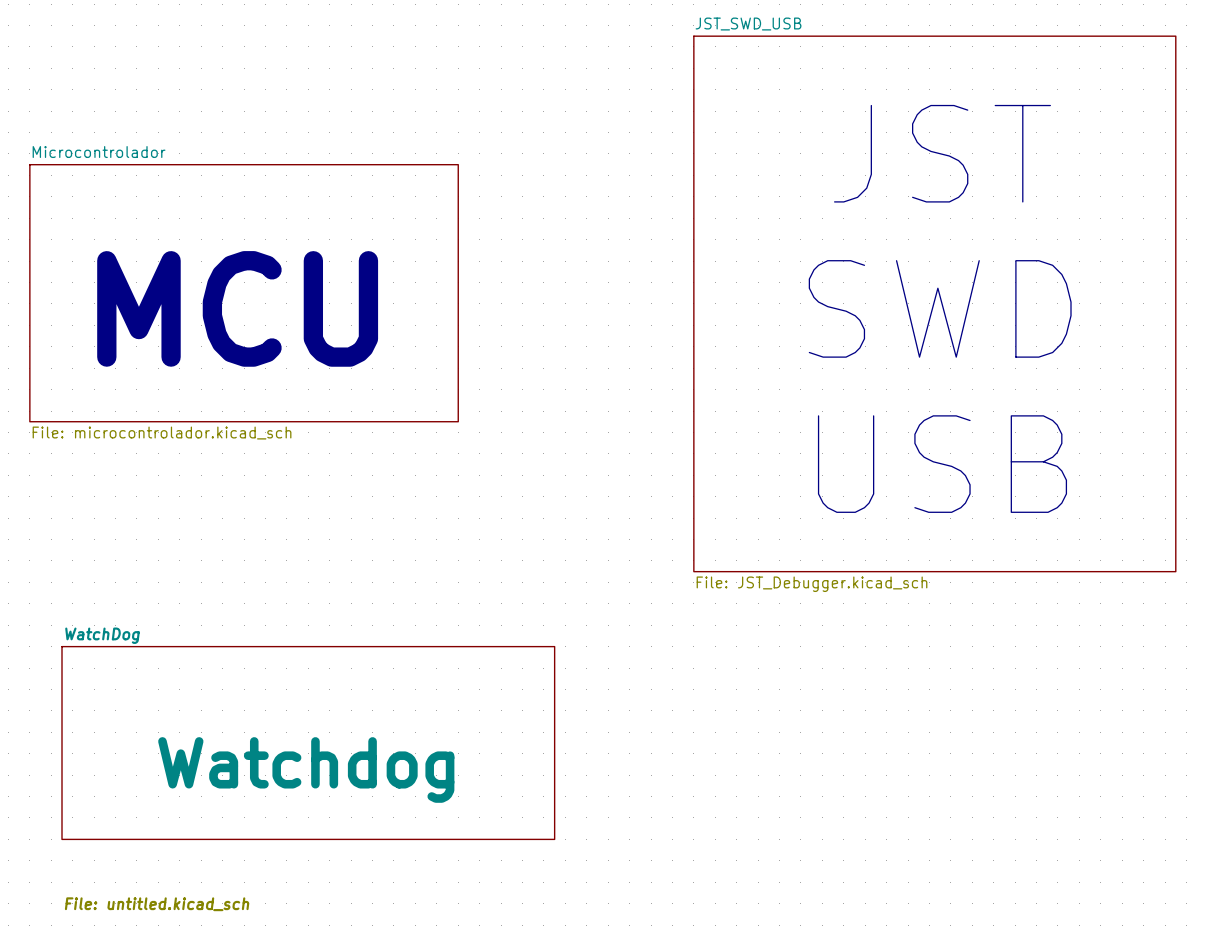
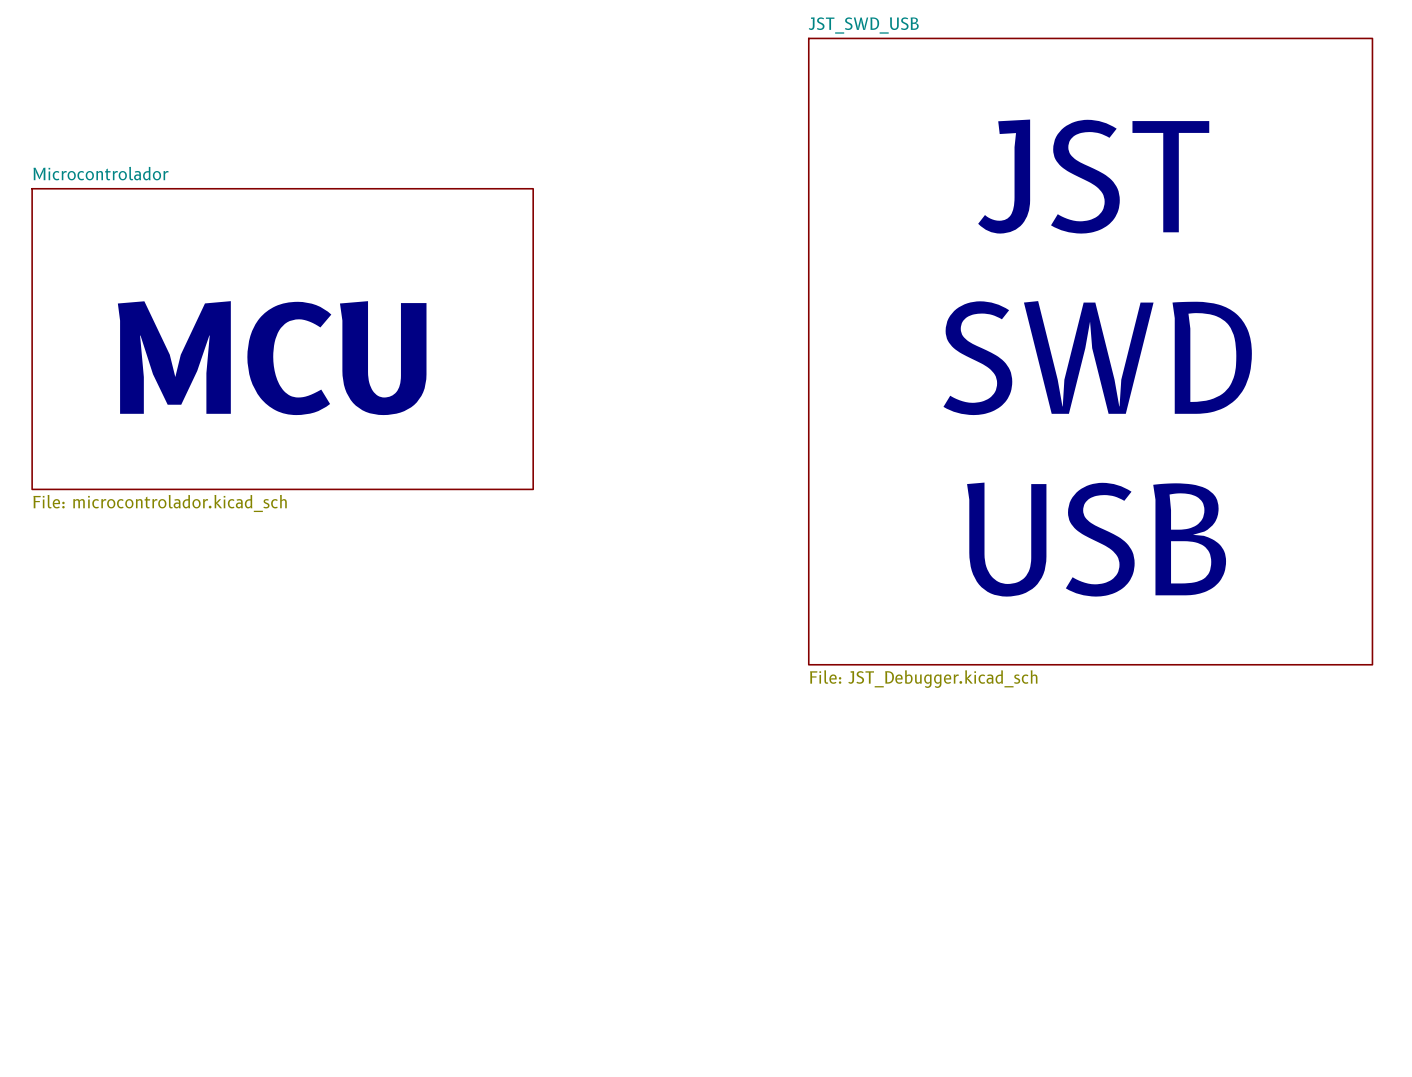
sheet WatchDog: File: untitled.kicad_sch (308, 743) -> none

